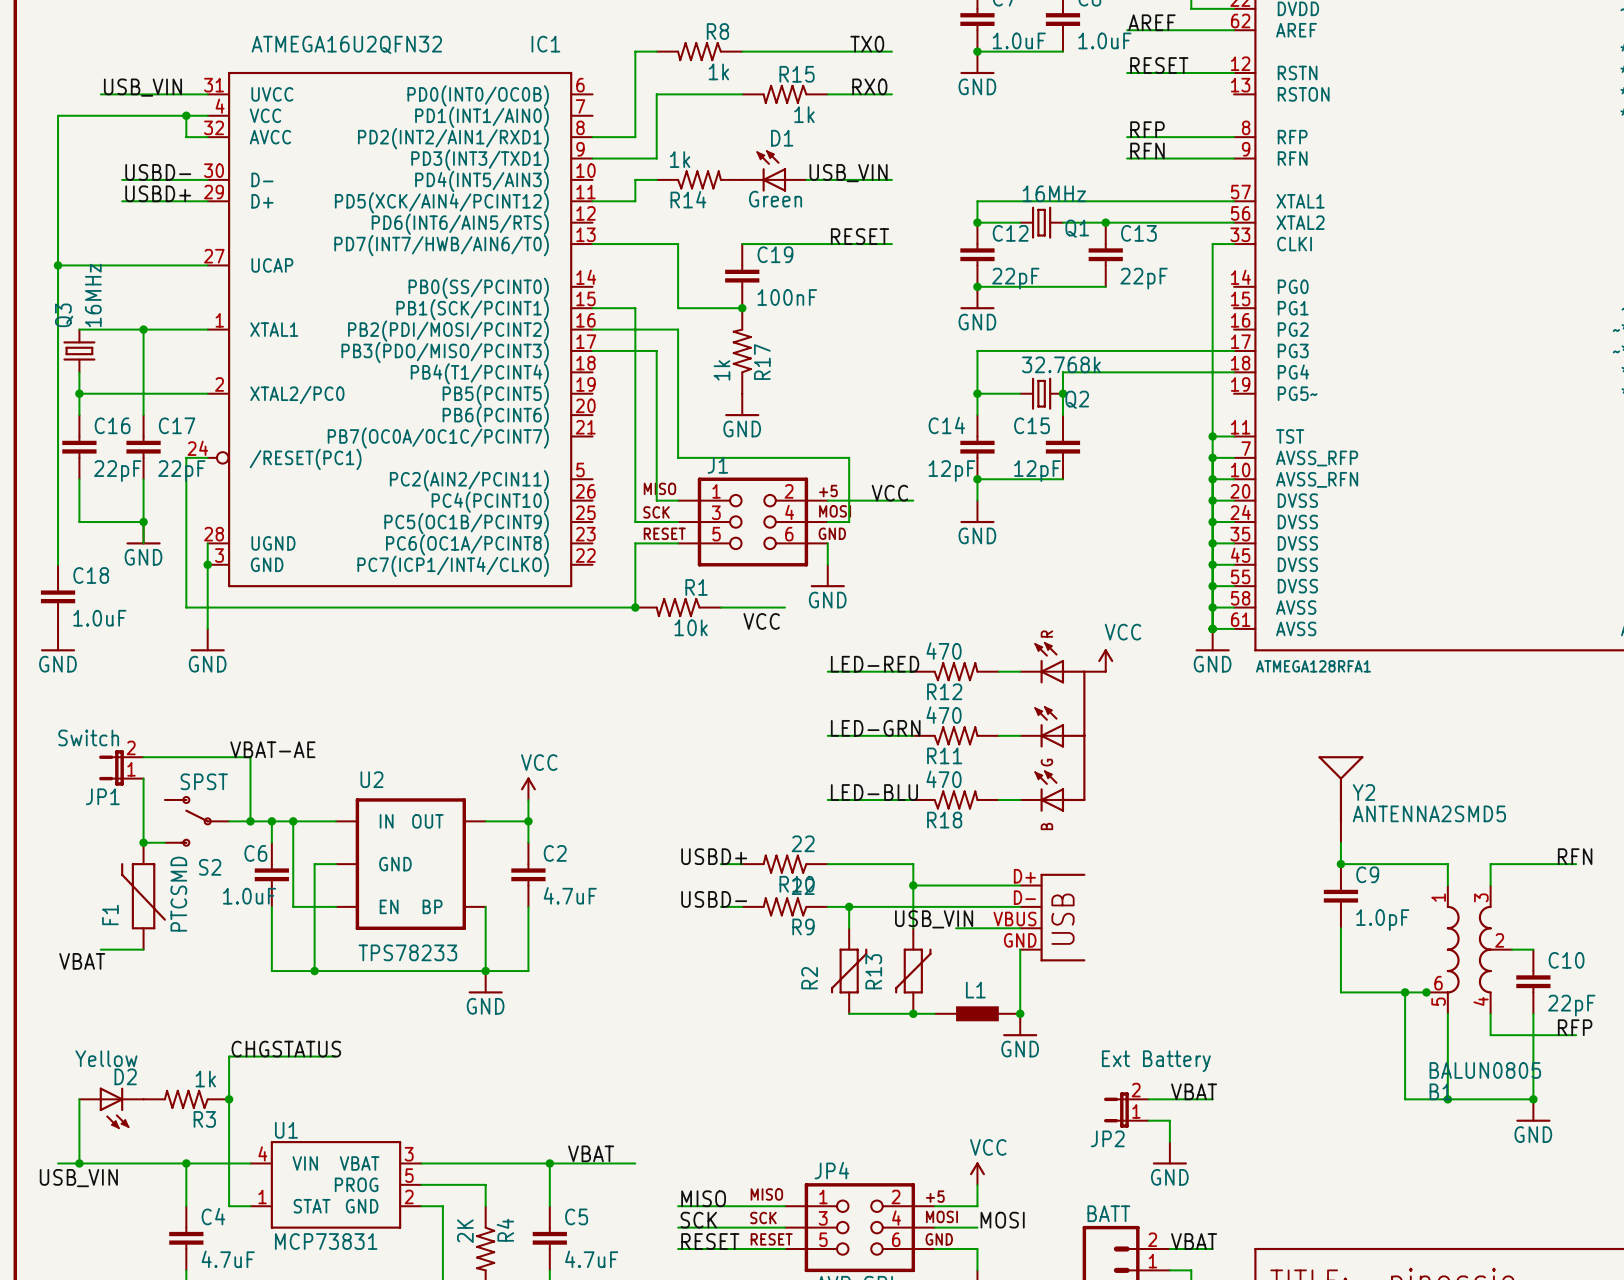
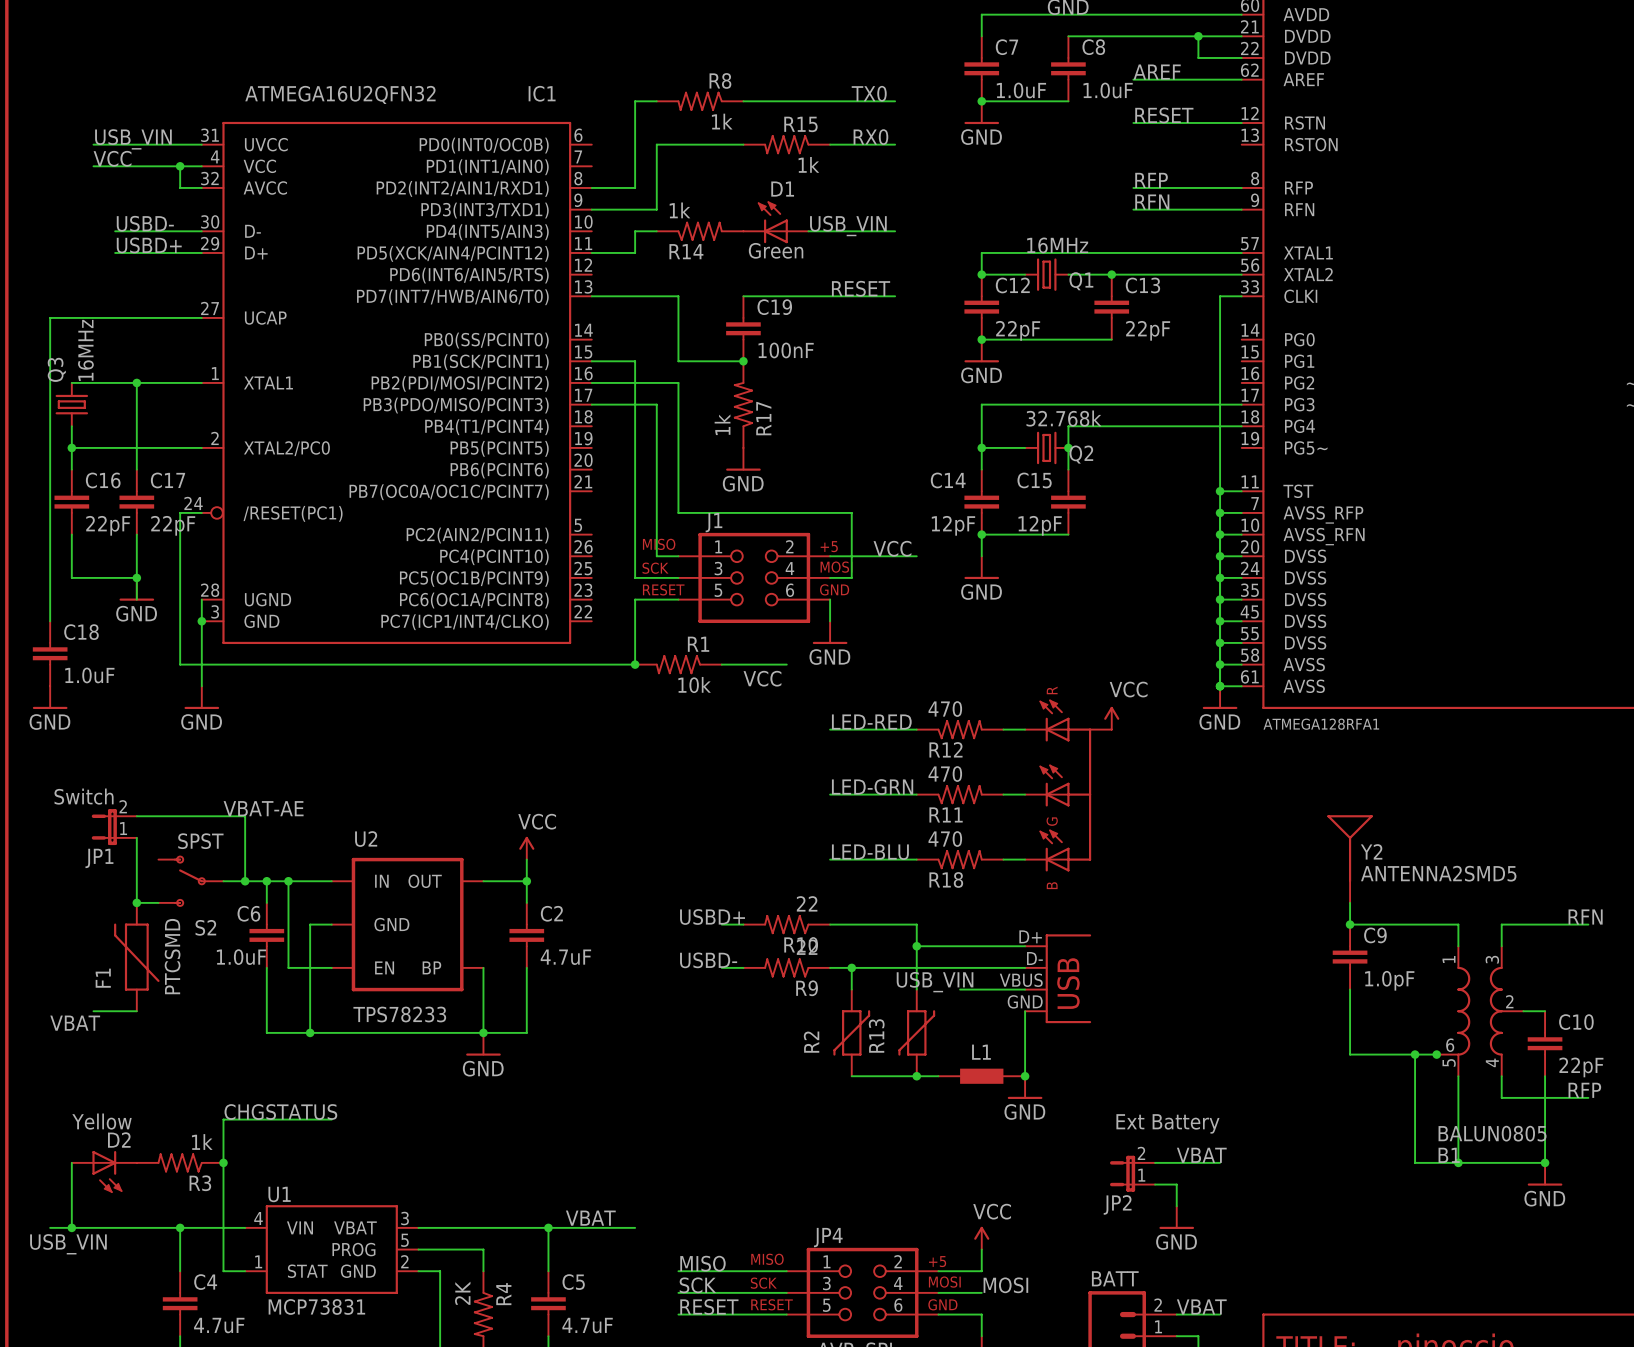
label: none -> VCC (112, 158)
wire: (100, 115) (58, 115) (58, 265) -> none
junction: (58, 265) -> none

